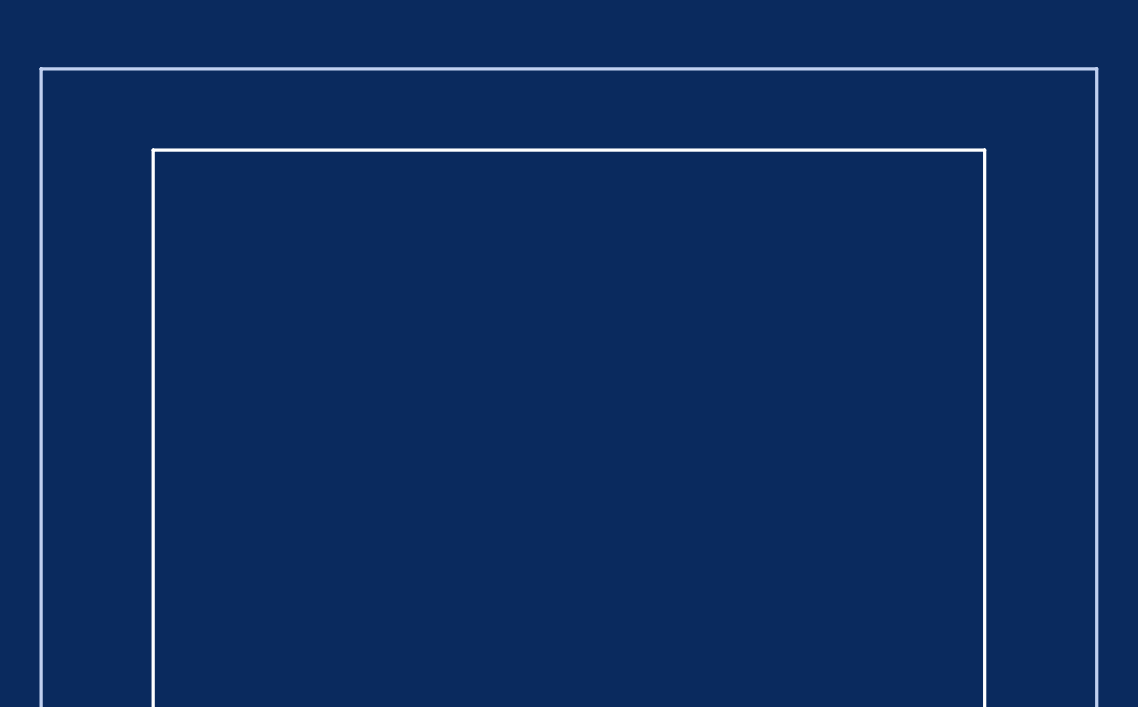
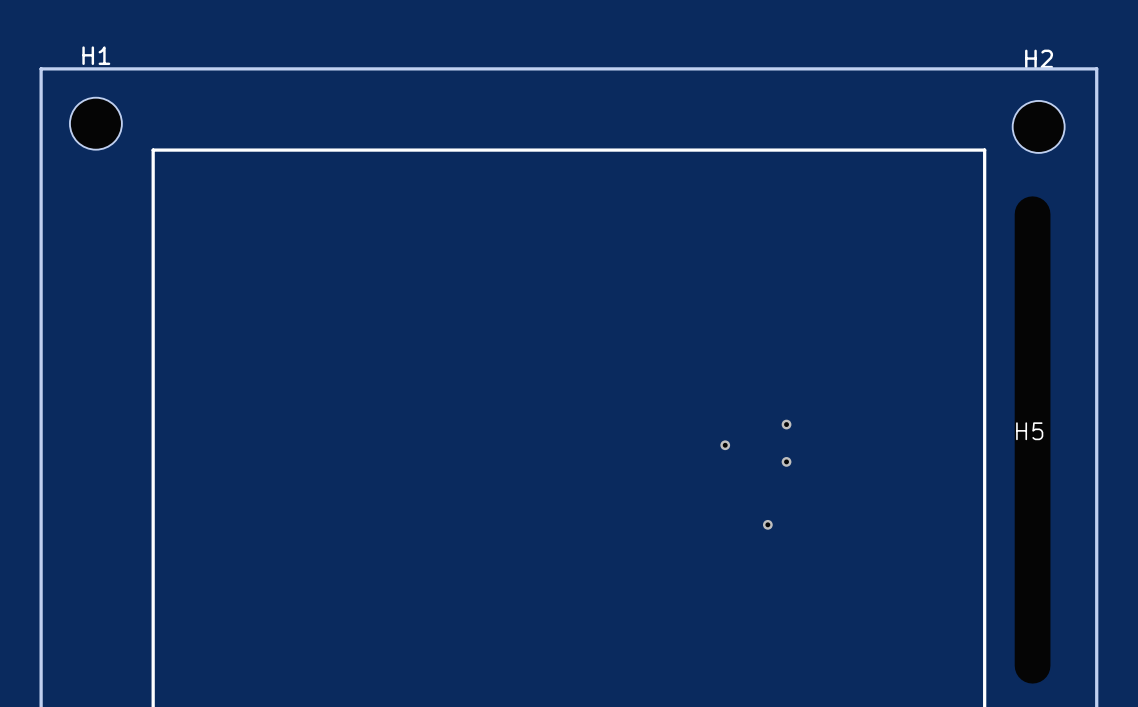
H1: none -> (95, 123)
H2: none -> (1038, 126)
via: none -> (786, 424)
H5: none -> (1032, 439)
via: none -> (725, 445)
via: none -> (786, 461)
via: none -> (767, 524)

